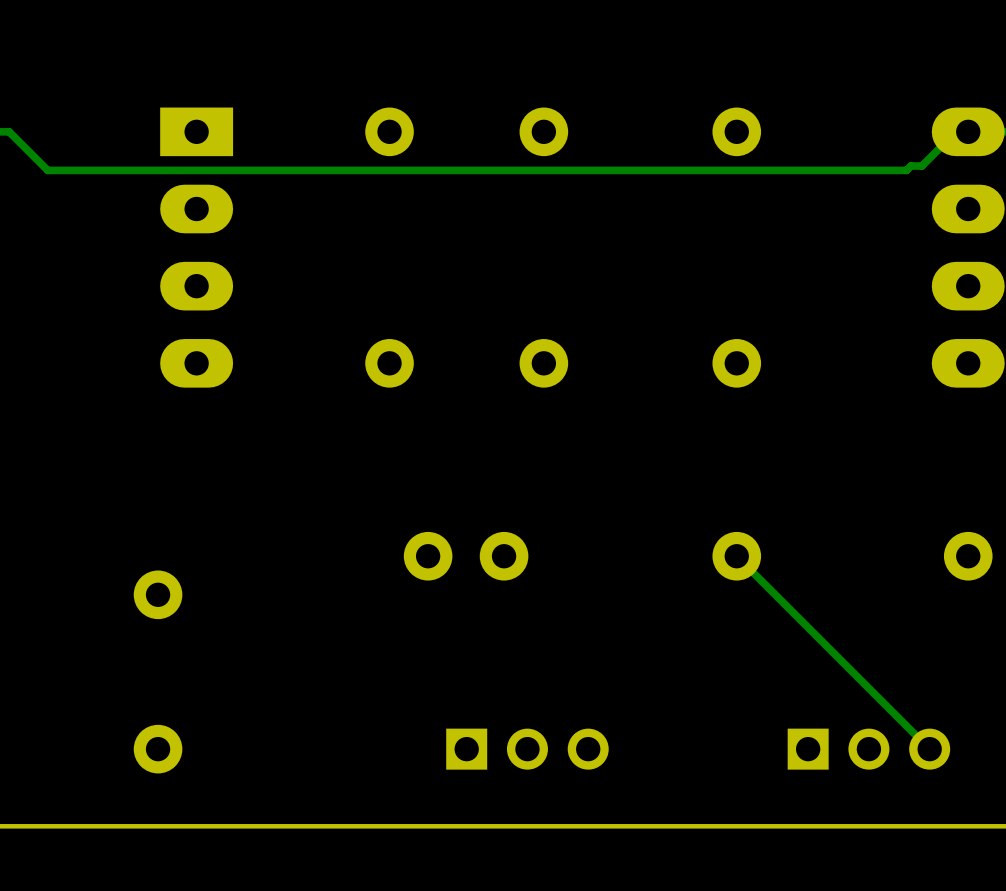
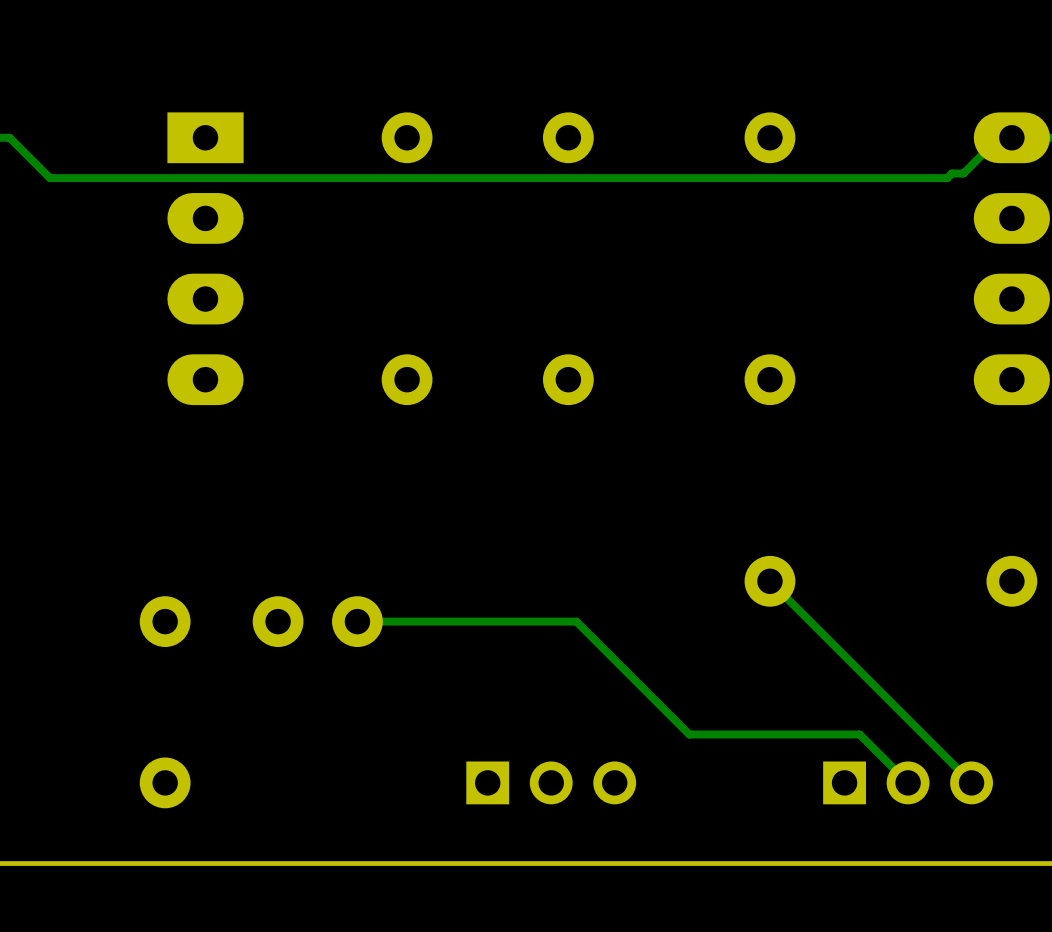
part position: (466, 556) -> (317, 621)
track: none -> (357, 621) (576, 621) (689, 734) (859, 734) (908, 782)

